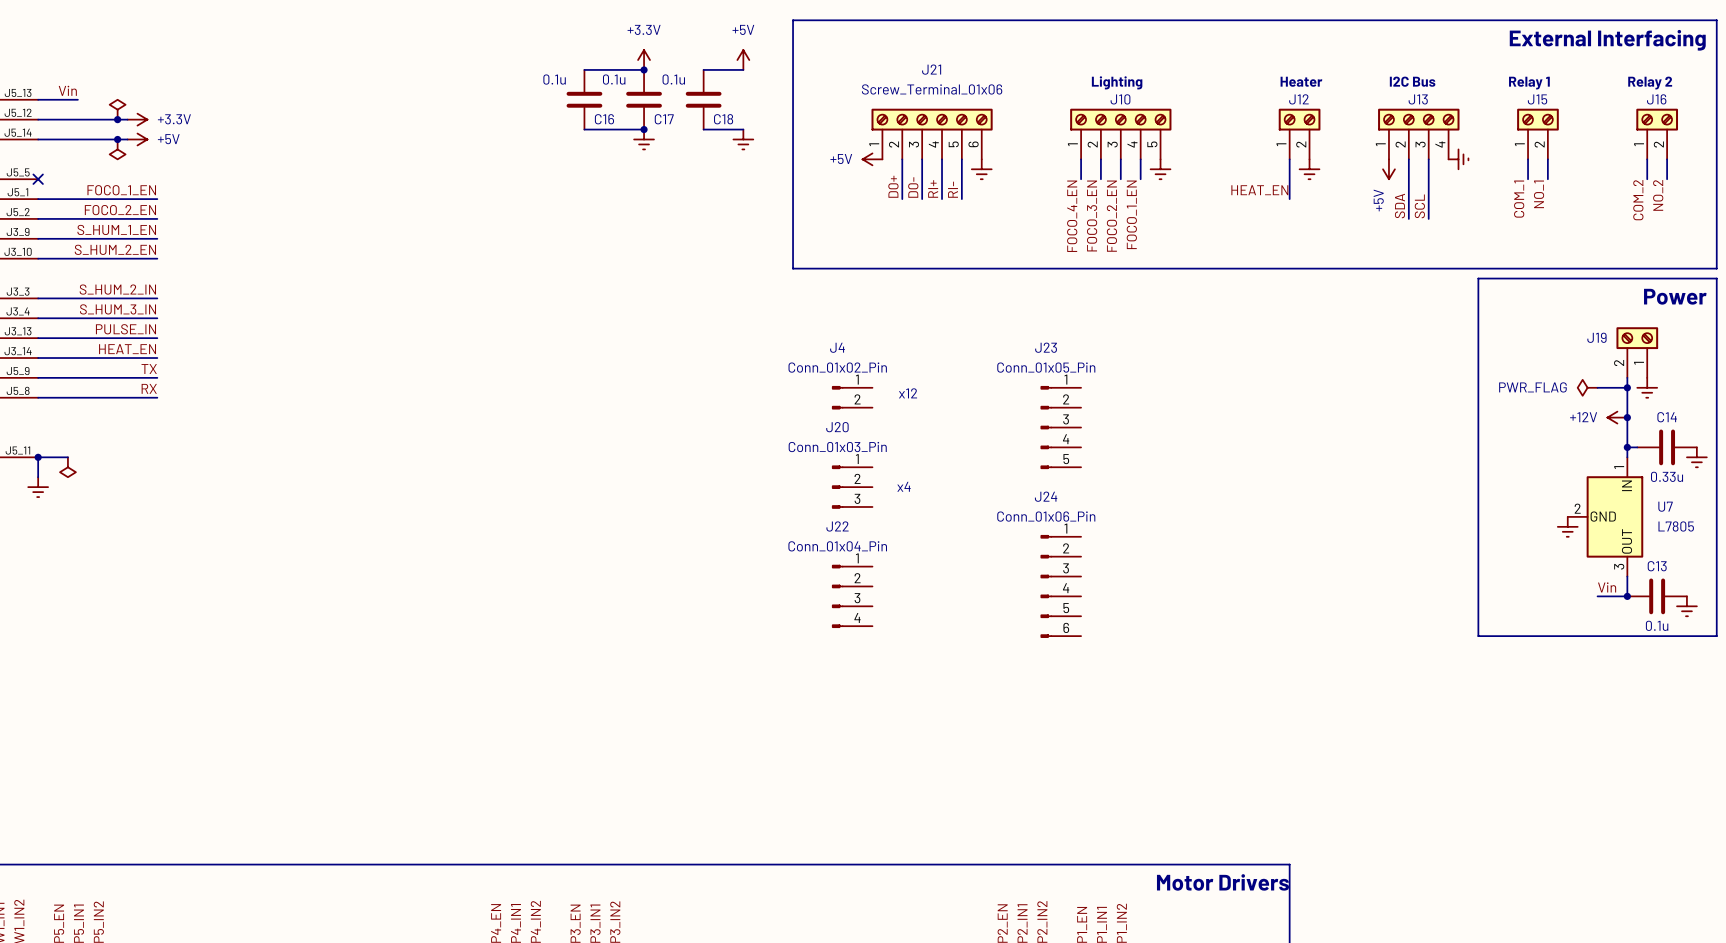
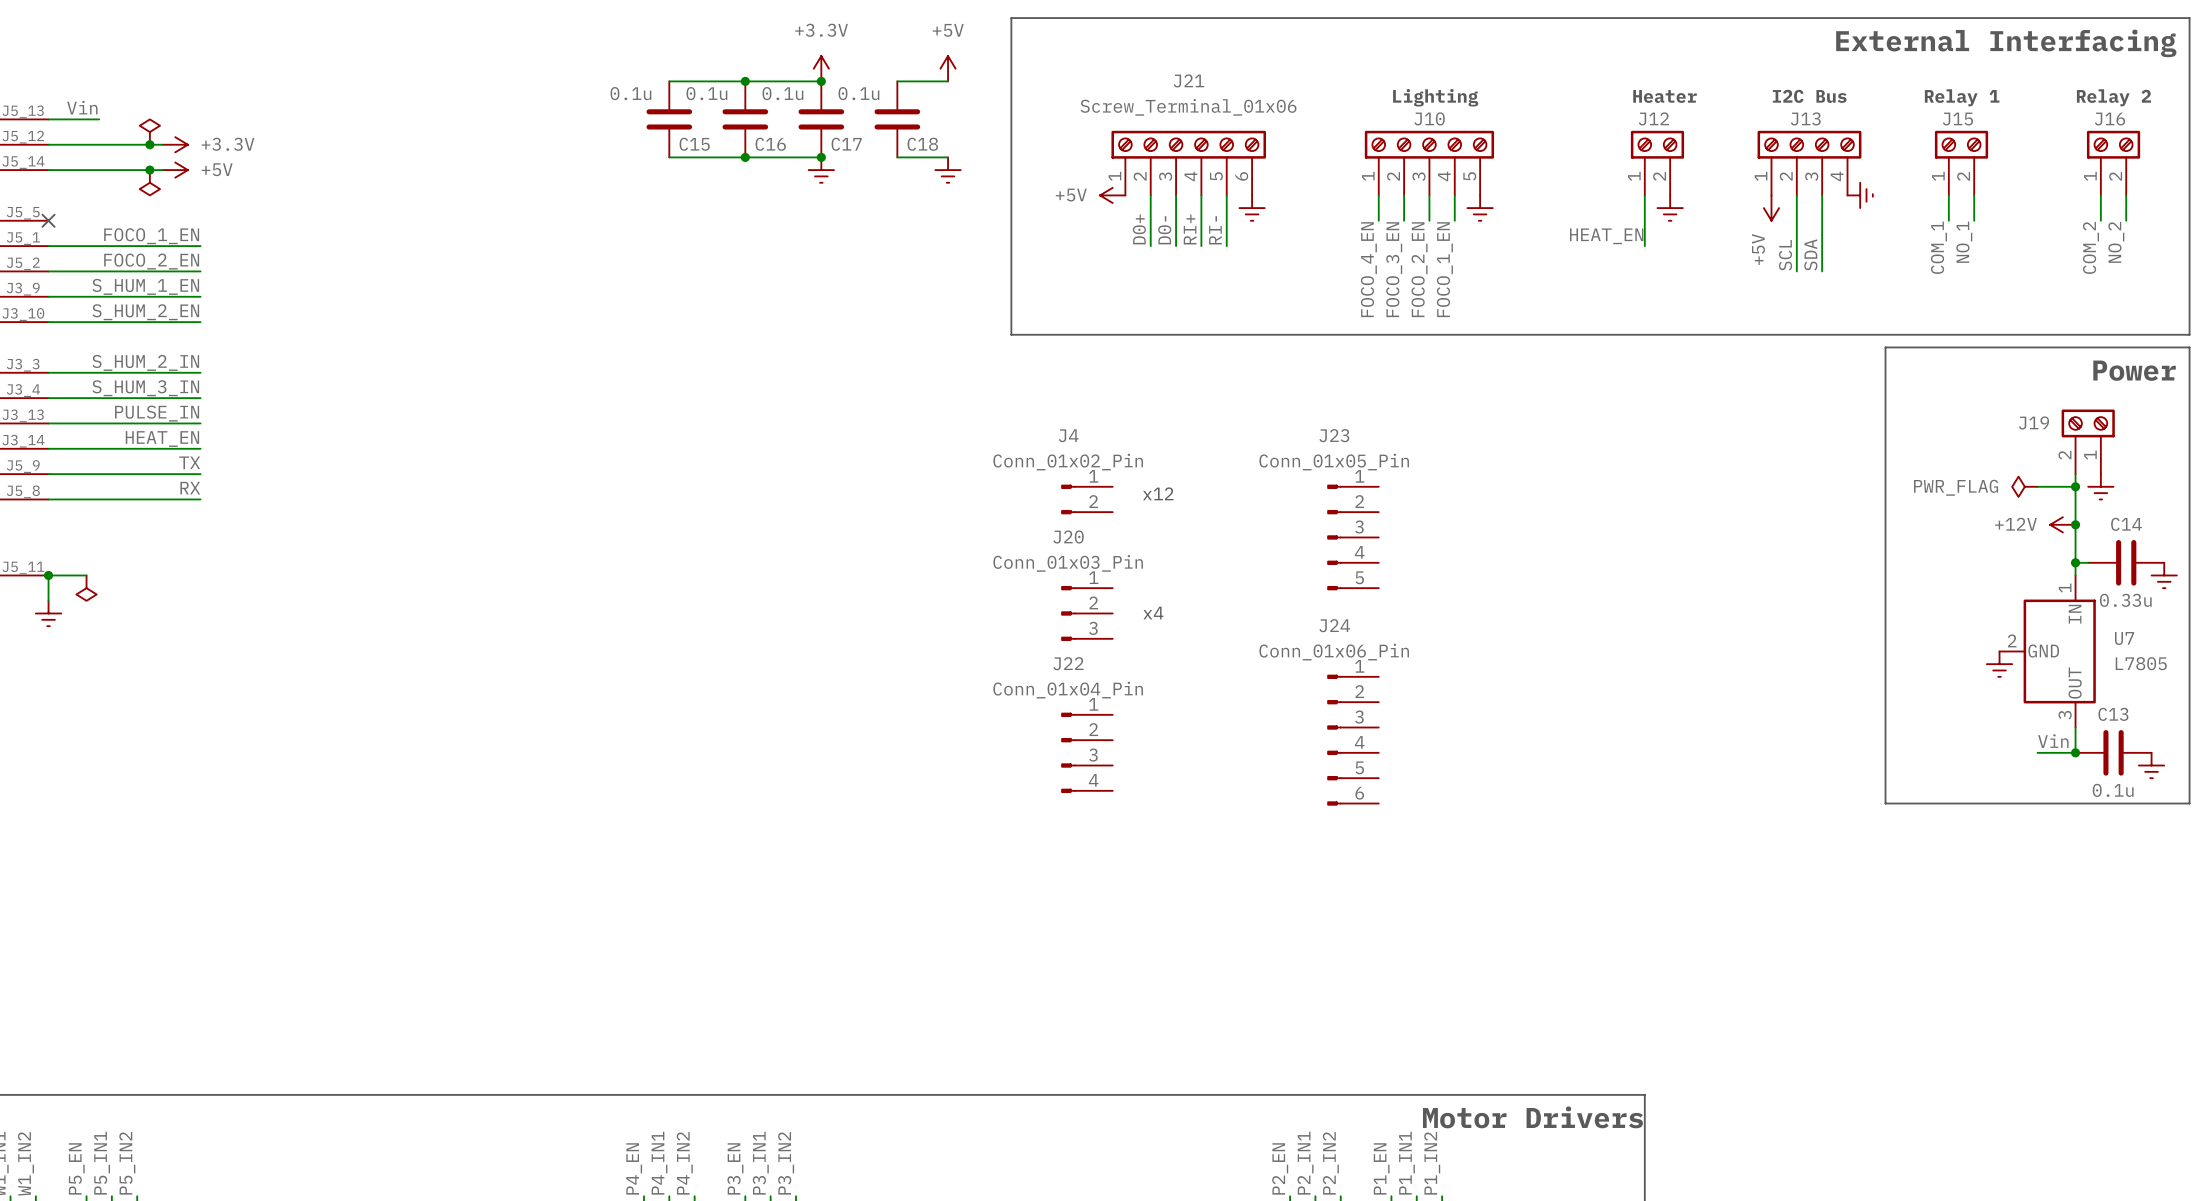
wire: none -> (669, 81) (745, 81)
junction: none -> (745, 81)
C15: none -> 0.1u (669, 119)
wire: none -> (669, 157) (745, 157)
junction: none -> (745, 157)
label: SDA (1399, 205) -> SCL (1785, 255)
label: SCL (1419, 206) -> SDA (1810, 254)

